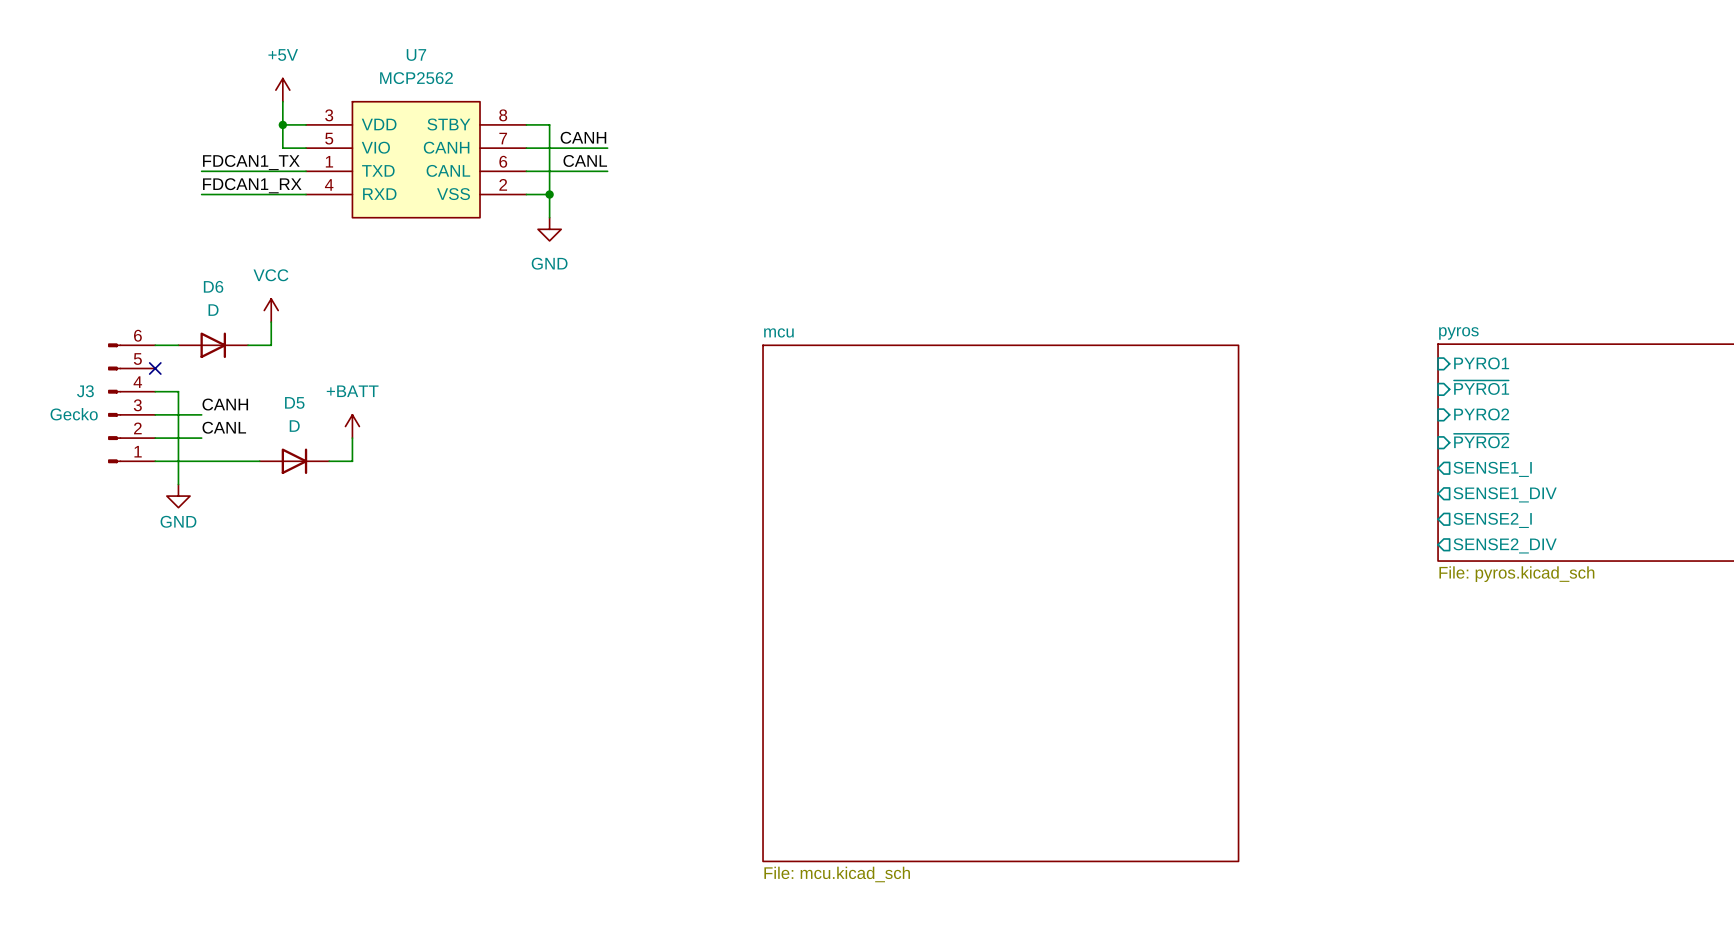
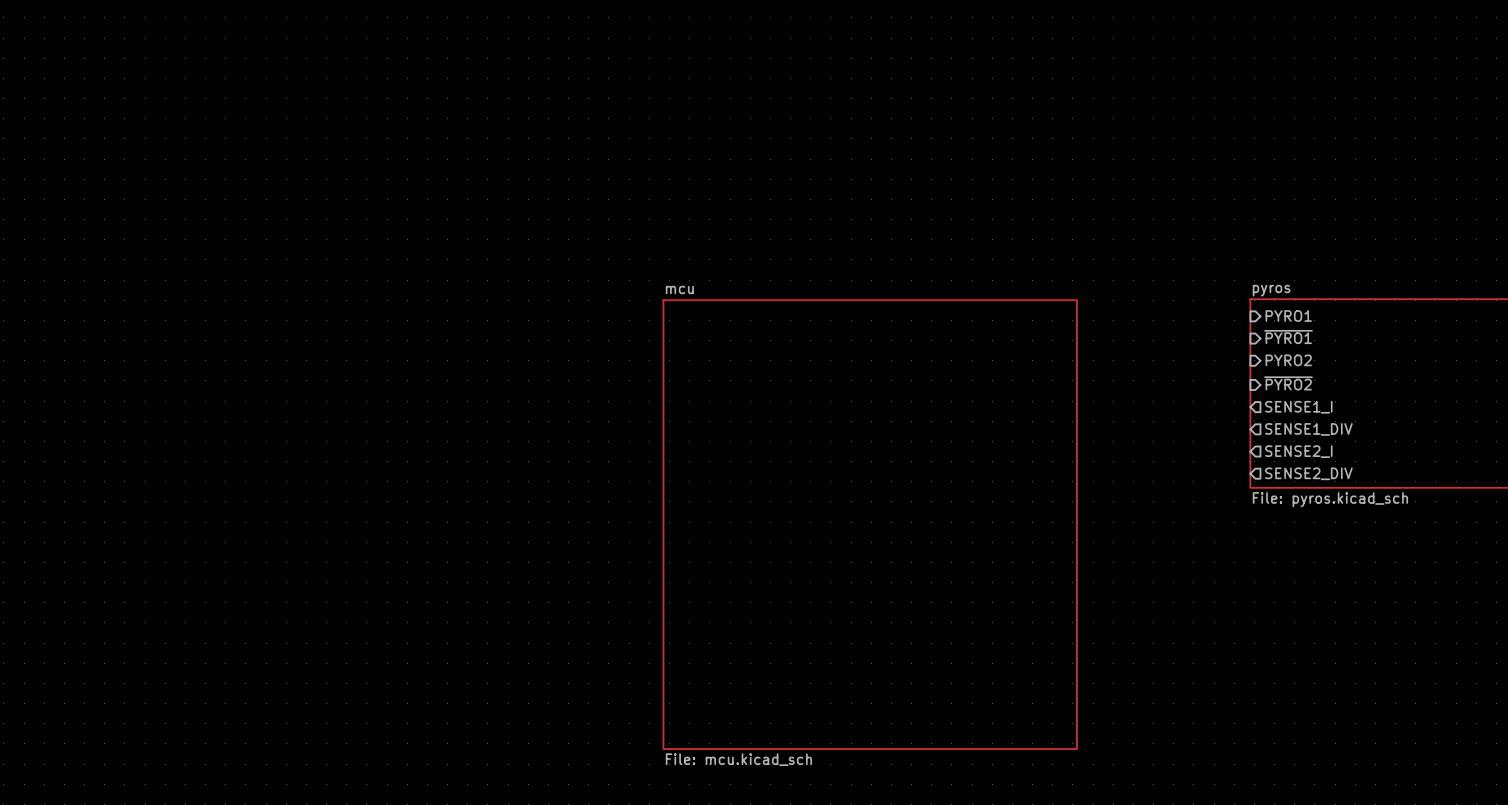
power symbol: +5V (282, 90) -> none
wire: (282, 101) (282, 148) (306, 148) -> none
wire: (282, 124) (306, 124) -> none
junction: (282, 124) -> none
wire: (526, 124) (549, 124) (549, 217) -> none
label: CANH (583, 137) -> none
wire: (526, 148) (607, 148) -> none
U7: MCP2562 (416, 159) -> none
label: CANL (585, 160) -> none
label: FDCAN1_TX (251, 162) -> none
wire: (201, 171) (306, 171) -> none
wire: (526, 171) (607, 171) -> none
label: FDCAN1_RX (252, 185) -> none
wire: (201, 194) (306, 194) -> none
wire: (526, 194) (549, 194) -> none
junction: (549, 194) -> none
power symbol: GND (549, 229) -> none
power symbol: VCC (271, 310) -> none
wire: (271, 322) (271, 345) (248, 345) -> none
wire: (155, 345) (178, 345) -> none
D6: D (213, 345) -> none
no-connect mark: (155, 368) -> none
wire: (155, 391) (178, 391) (178, 484) -> none
J3: Gecko (131, 403) -> none
label: CANH (225, 404) -> none
wire: (155, 414) (201, 414) -> none
power symbol: +BATT (352, 426) -> none
label: CANL (224, 427) -> none
wire: (155, 438) (201, 438) -> none
wire: (352, 438) (352, 461) (329, 461) -> none
wire: (155, 461) (259, 461) -> none
D5: D (294, 461) -> none
power symbol: GND (178, 496) -> none

